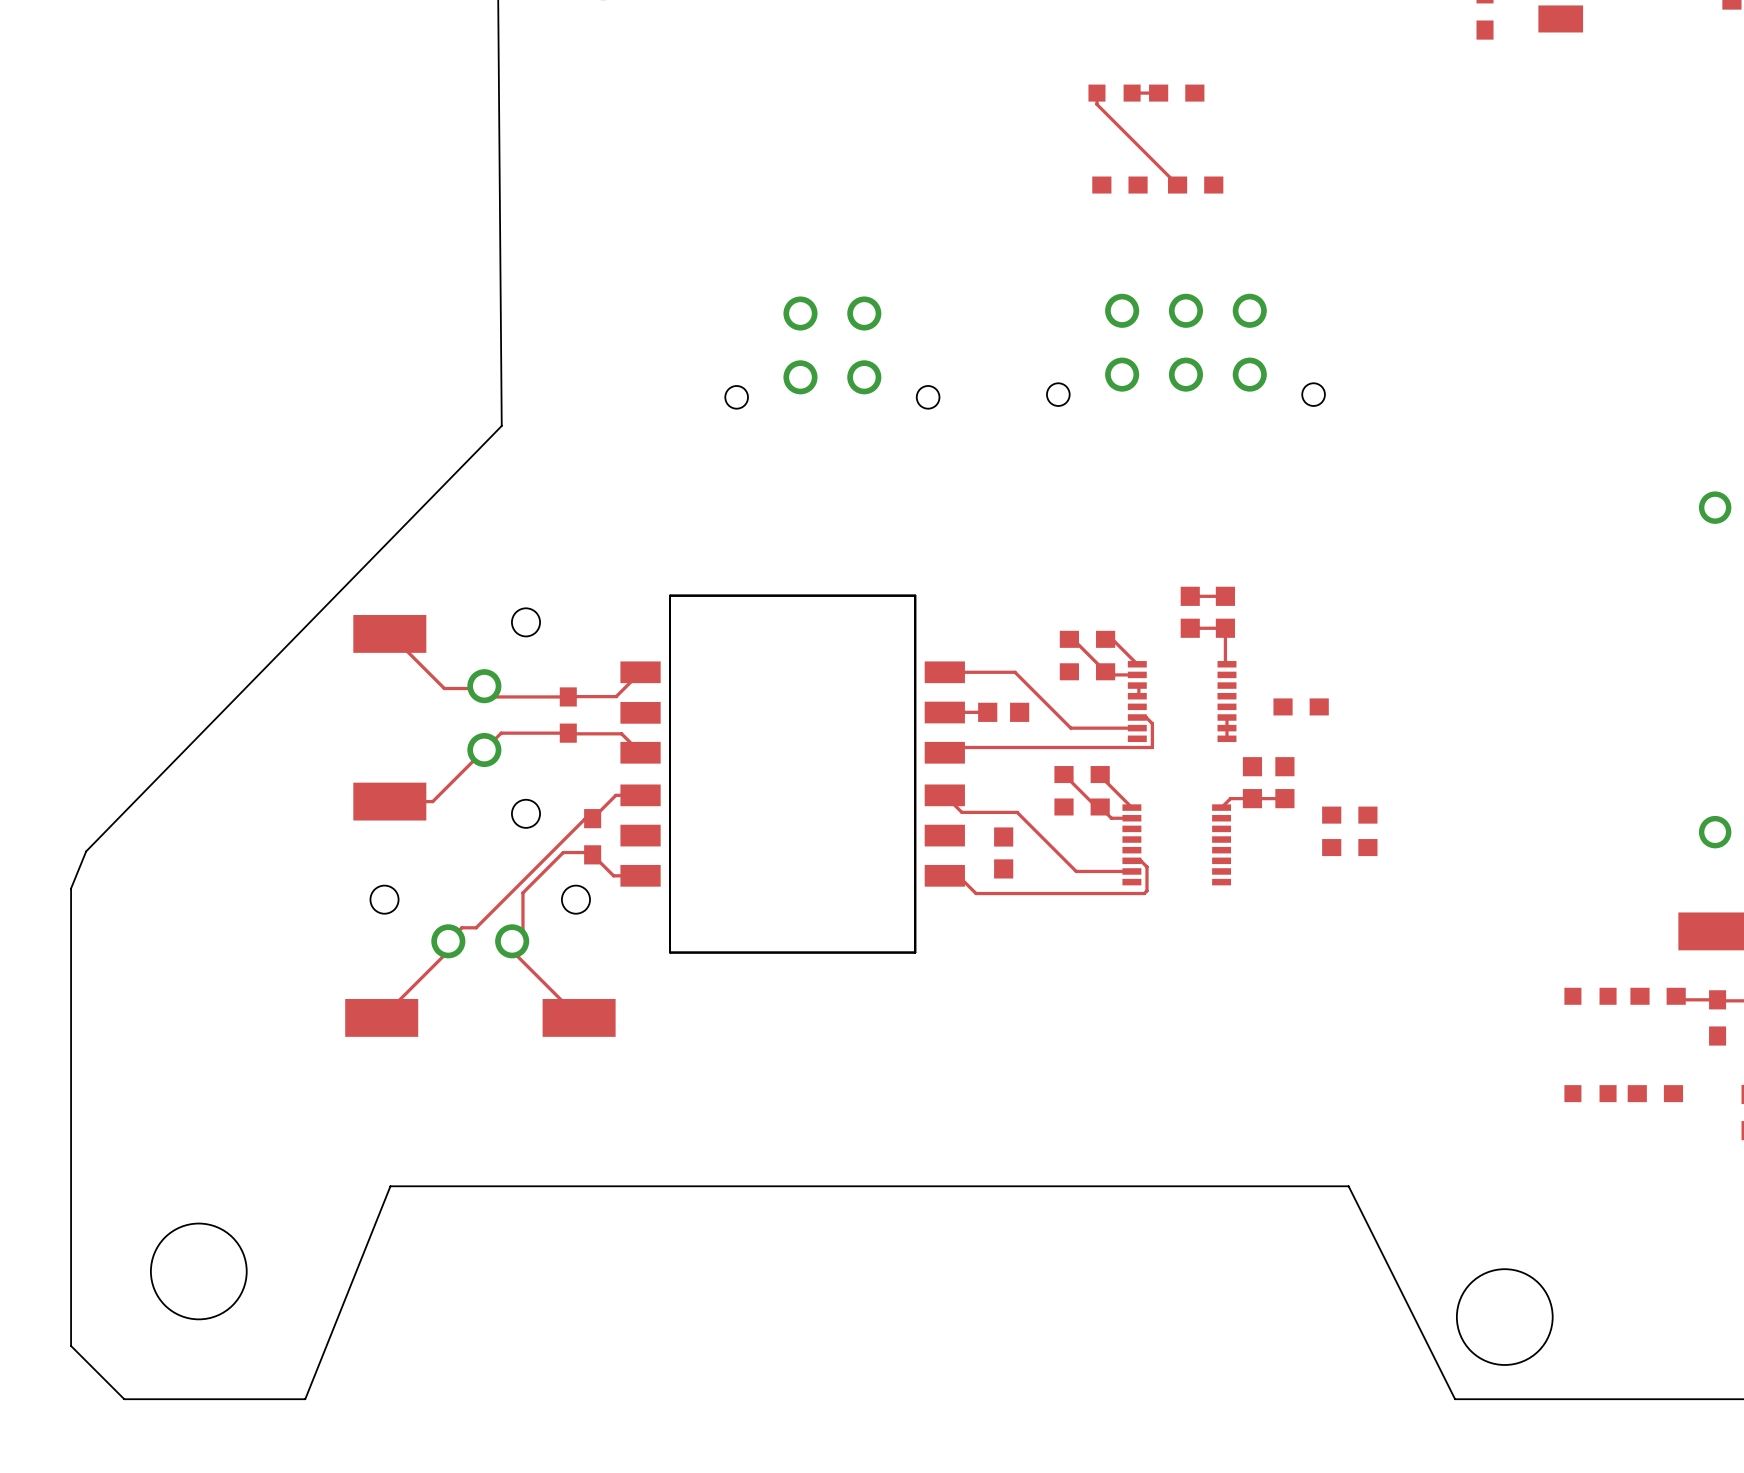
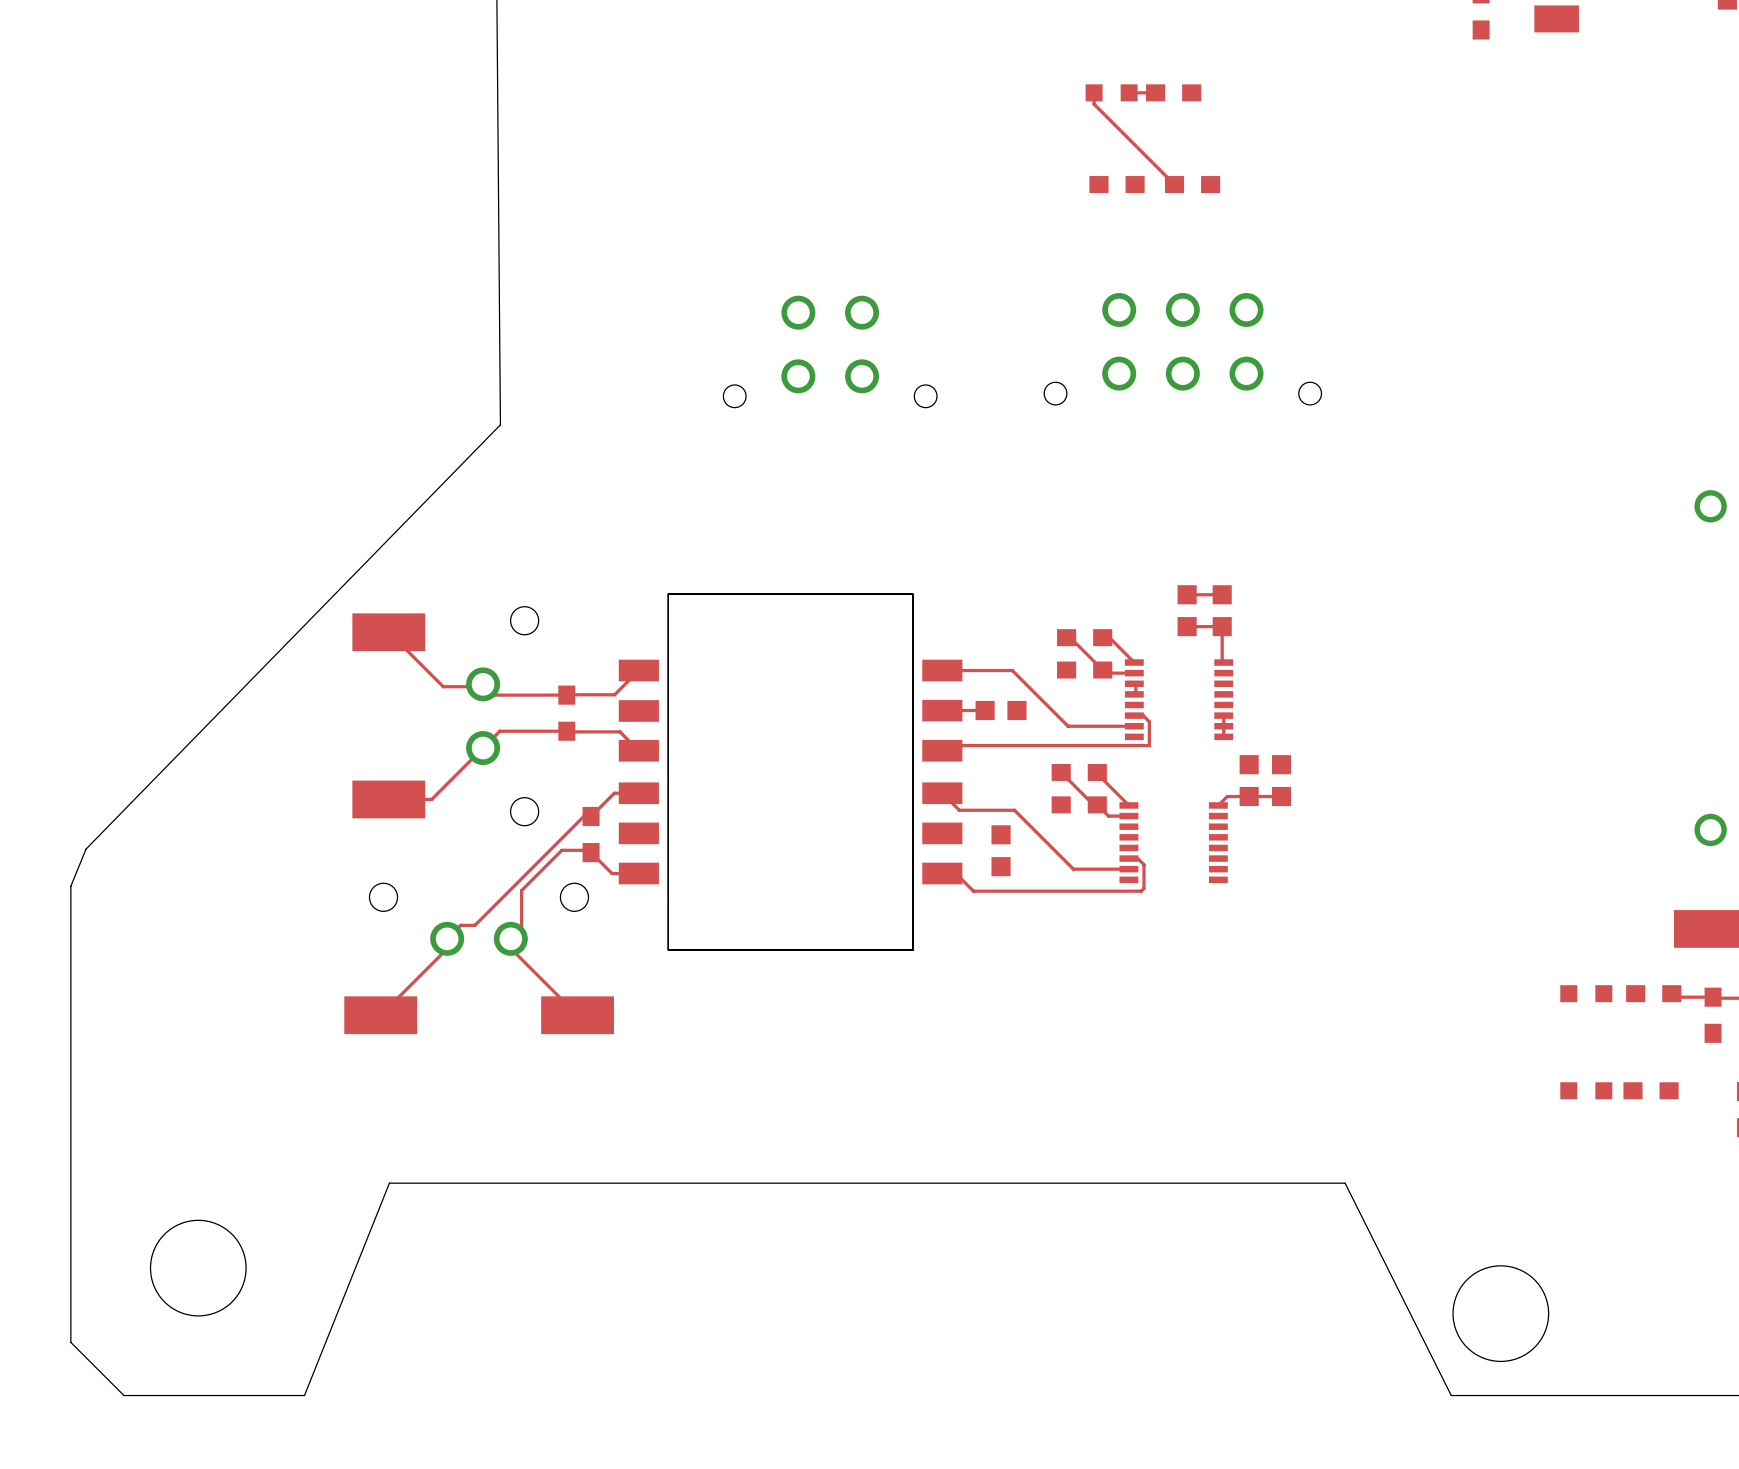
part: (1301, 706) -> none
part: (1349, 815) -> none
part: (1349, 847) -> none

